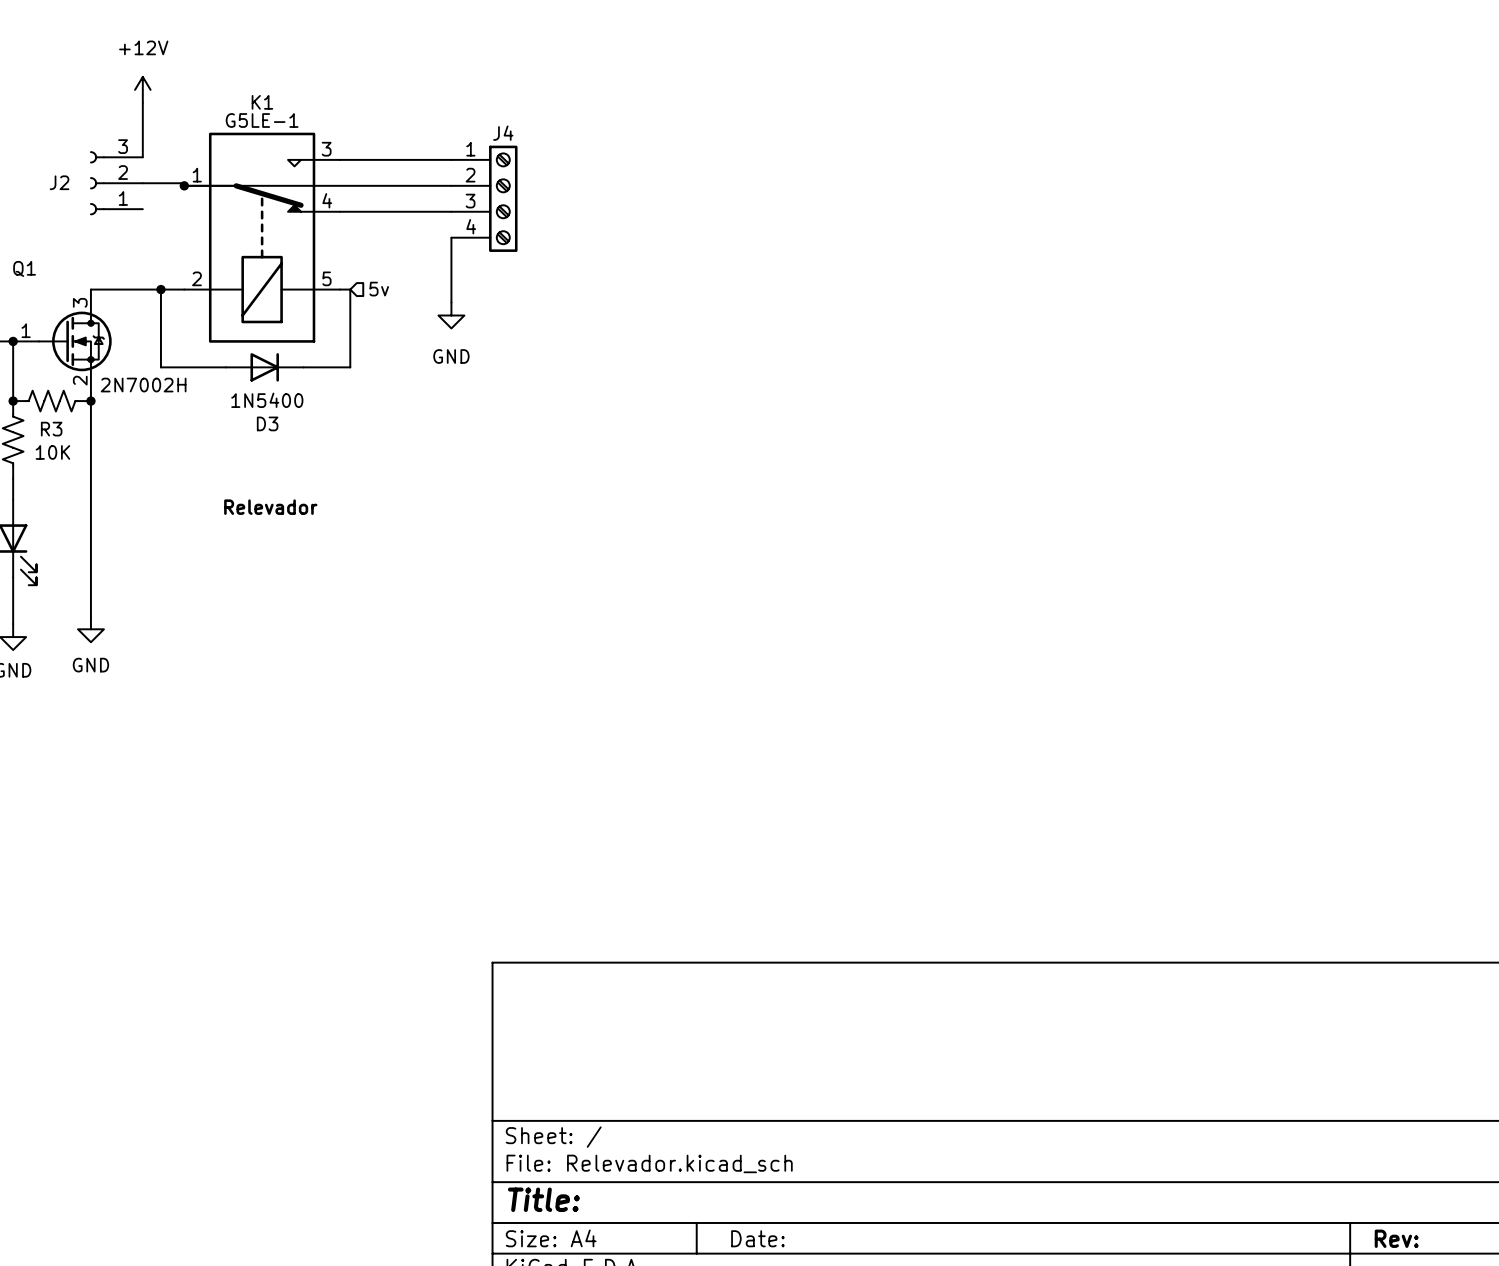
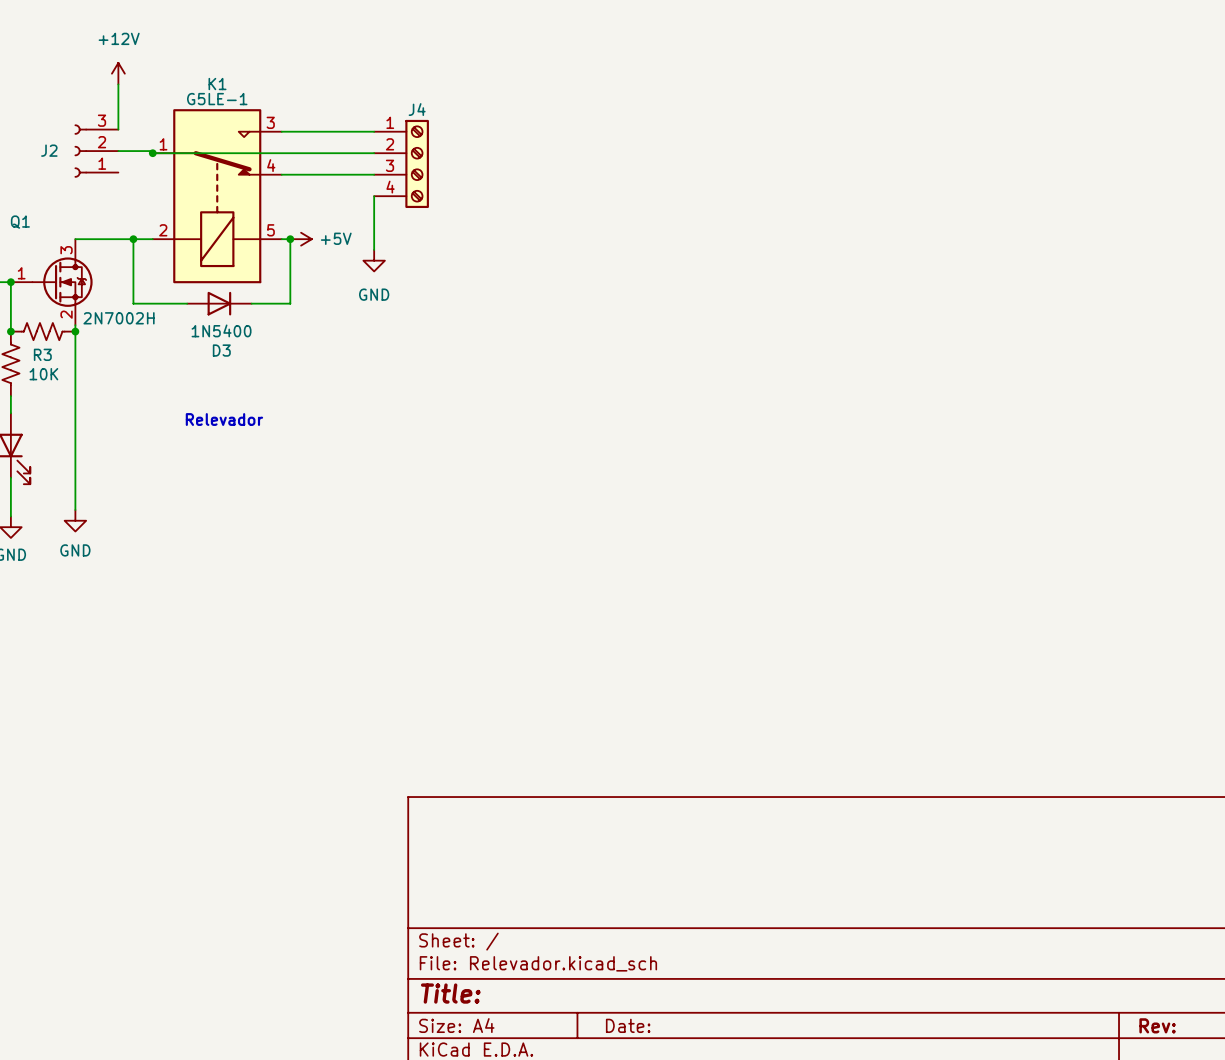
junction: none -> (290, 239)
power symbol: none -> +5V (301, 239)
hierarchical label: 5v (379, 289) -> none

